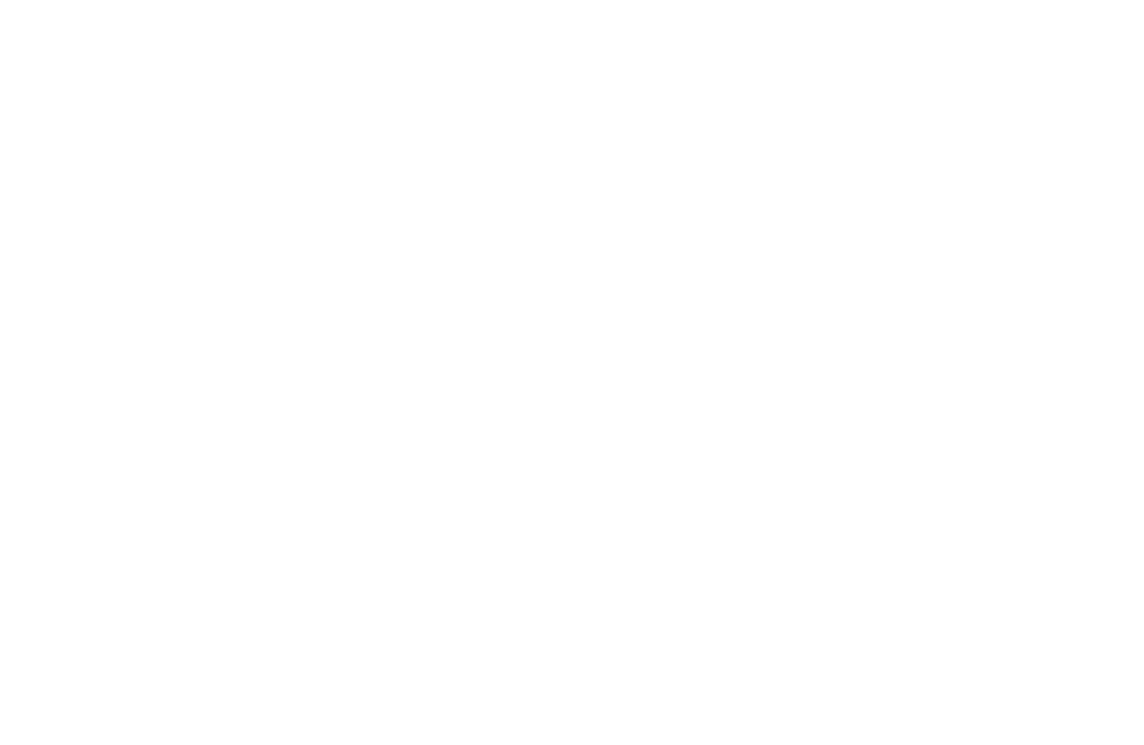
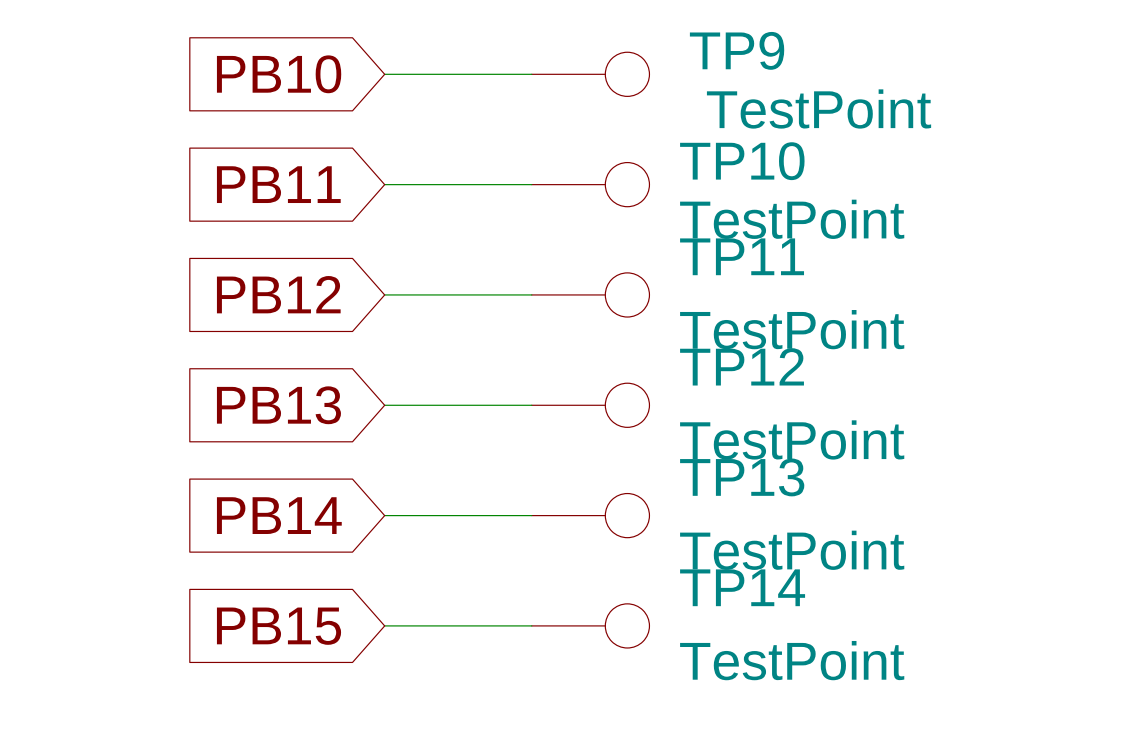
global label: none -> PB10 (279, 74)
wire: none -> (384, 74) (531, 74)
TP9: none -> TestPoint (590, 74)
global label: none -> PB11 (278, 184)
wire: none -> (384, 184) (531, 184)
TP10: none -> TestPoint (590, 184)
global label: none -> PB12 (278, 294)
wire: none -> (384, 294) (531, 294)
TP11: none -> TestPoint (590, 294)
global label: none -> PB13 (278, 405)
wire: none -> (384, 405) (531, 405)
TP12: none -> TestPoint (590, 405)
global label: none -> PB14 (279, 515)
wire: none -> (384, 515) (531, 515)
TP13: none -> TestPoint (590, 515)
global label: none -> PB15 (279, 626)
wire: none -> (384, 625) (531, 625)
TP14: none -> TestPoint (590, 625)

